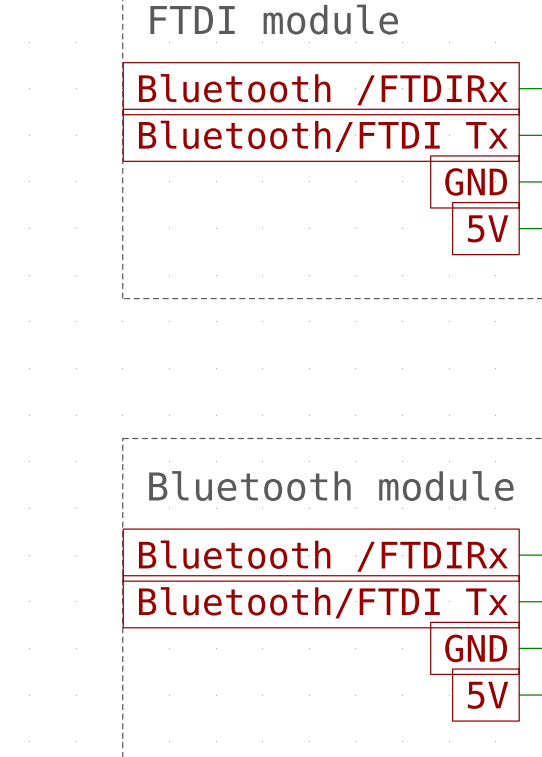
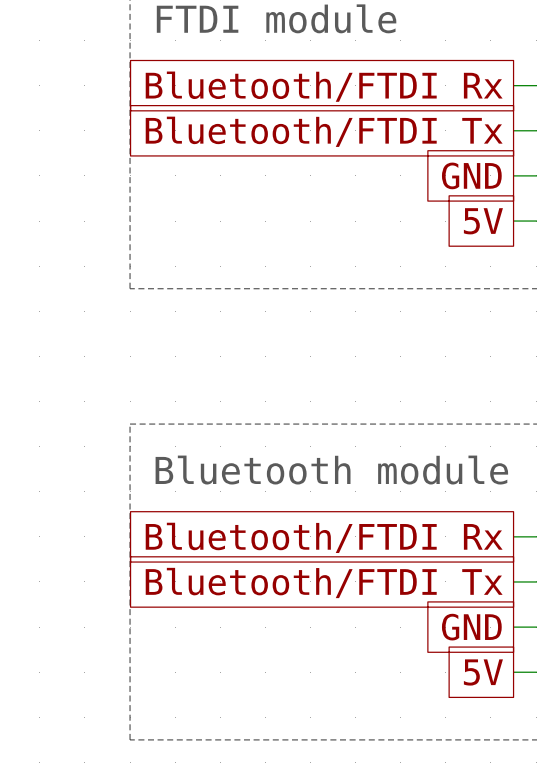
global label: Bluetooth /FTDIRx (323, 89) -> Bluetooth/FTDI Rx (324, 86)
global label: Bluetooth /FTDIRx (323, 556) -> Bluetooth/FTDI Rx (324, 537)

